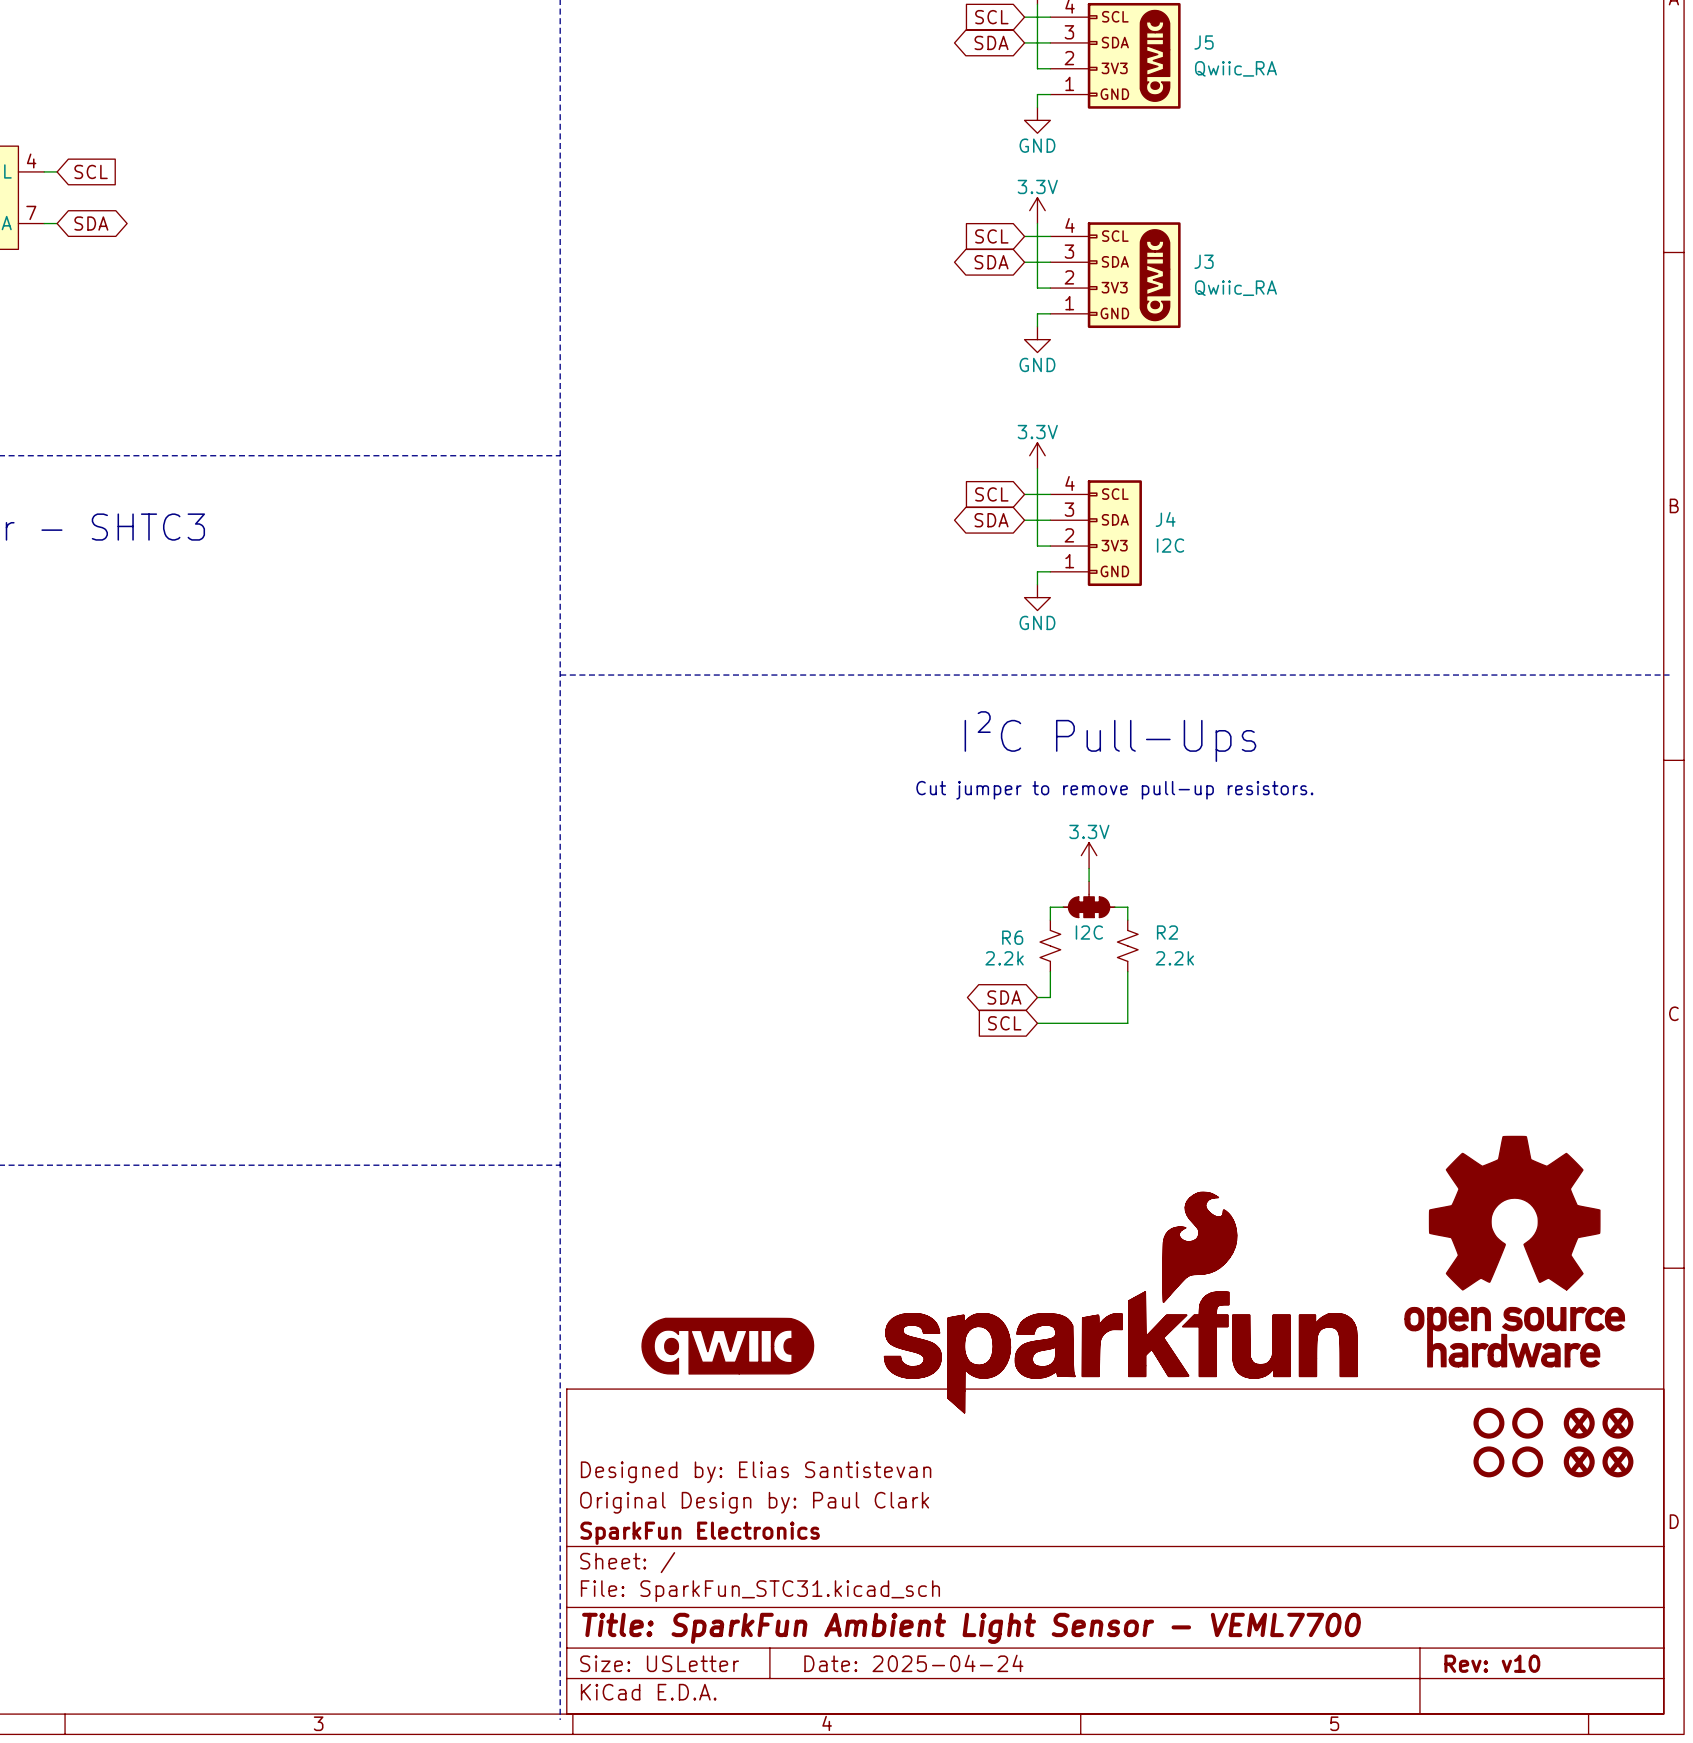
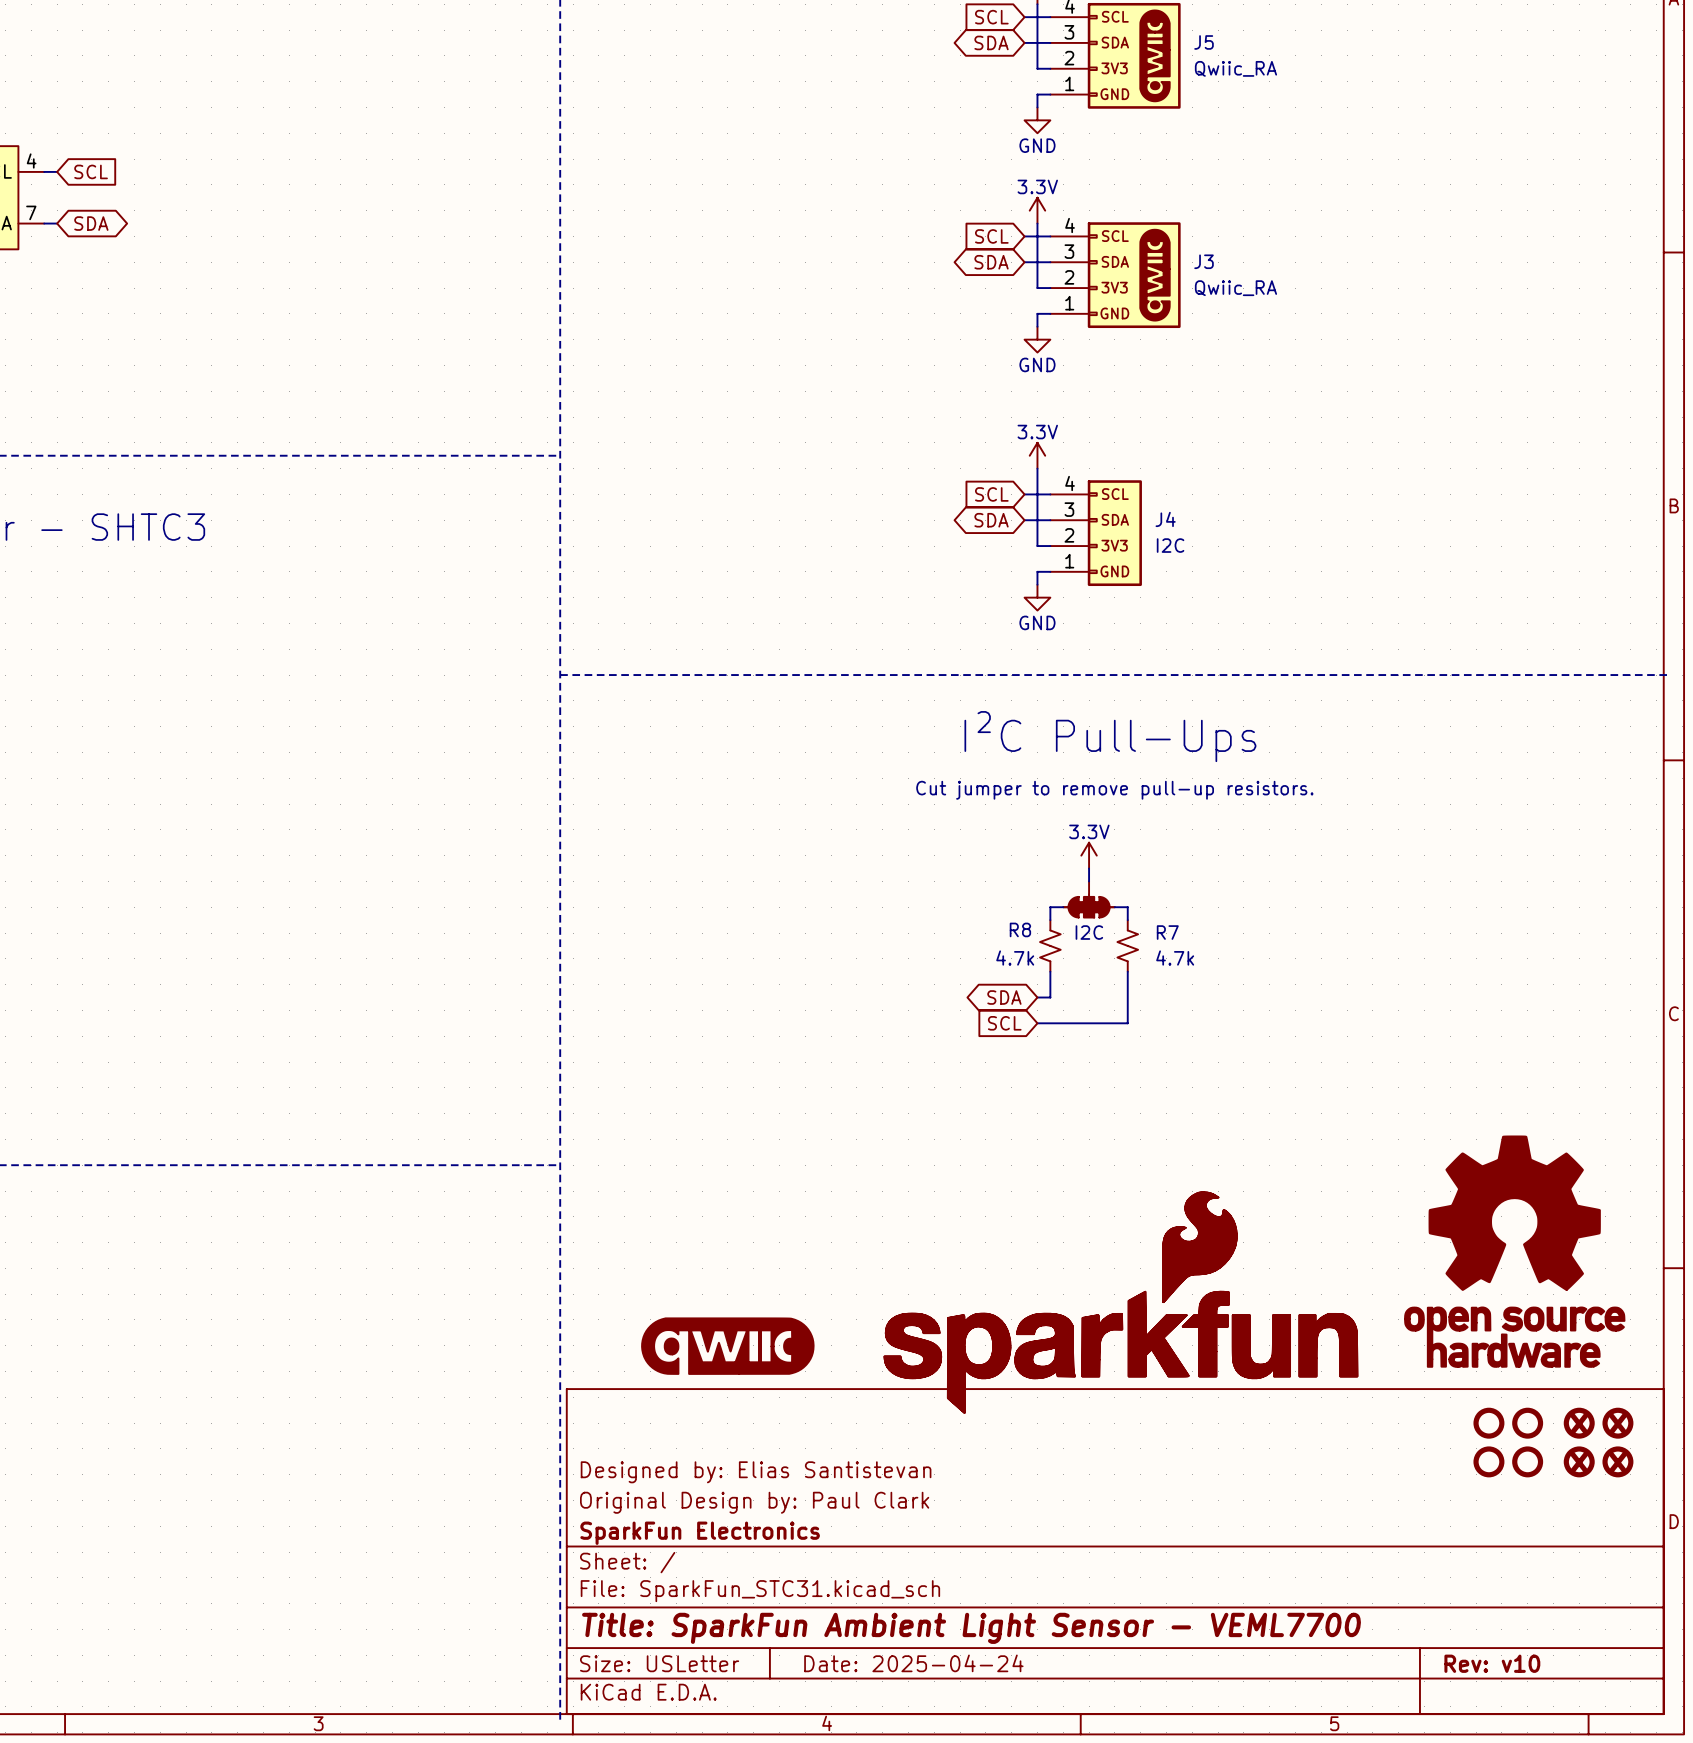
R2 name: R2 (1167, 932) -> R7 (1167, 932)
R6 name: R6 (1012, 937) -> R8 (1020, 929)
R6 value: 2.2k (1004, 958) -> 4.7k (1015, 958)
R2 value: 2.2k (1174, 958) -> 4.7k (1175, 958)

